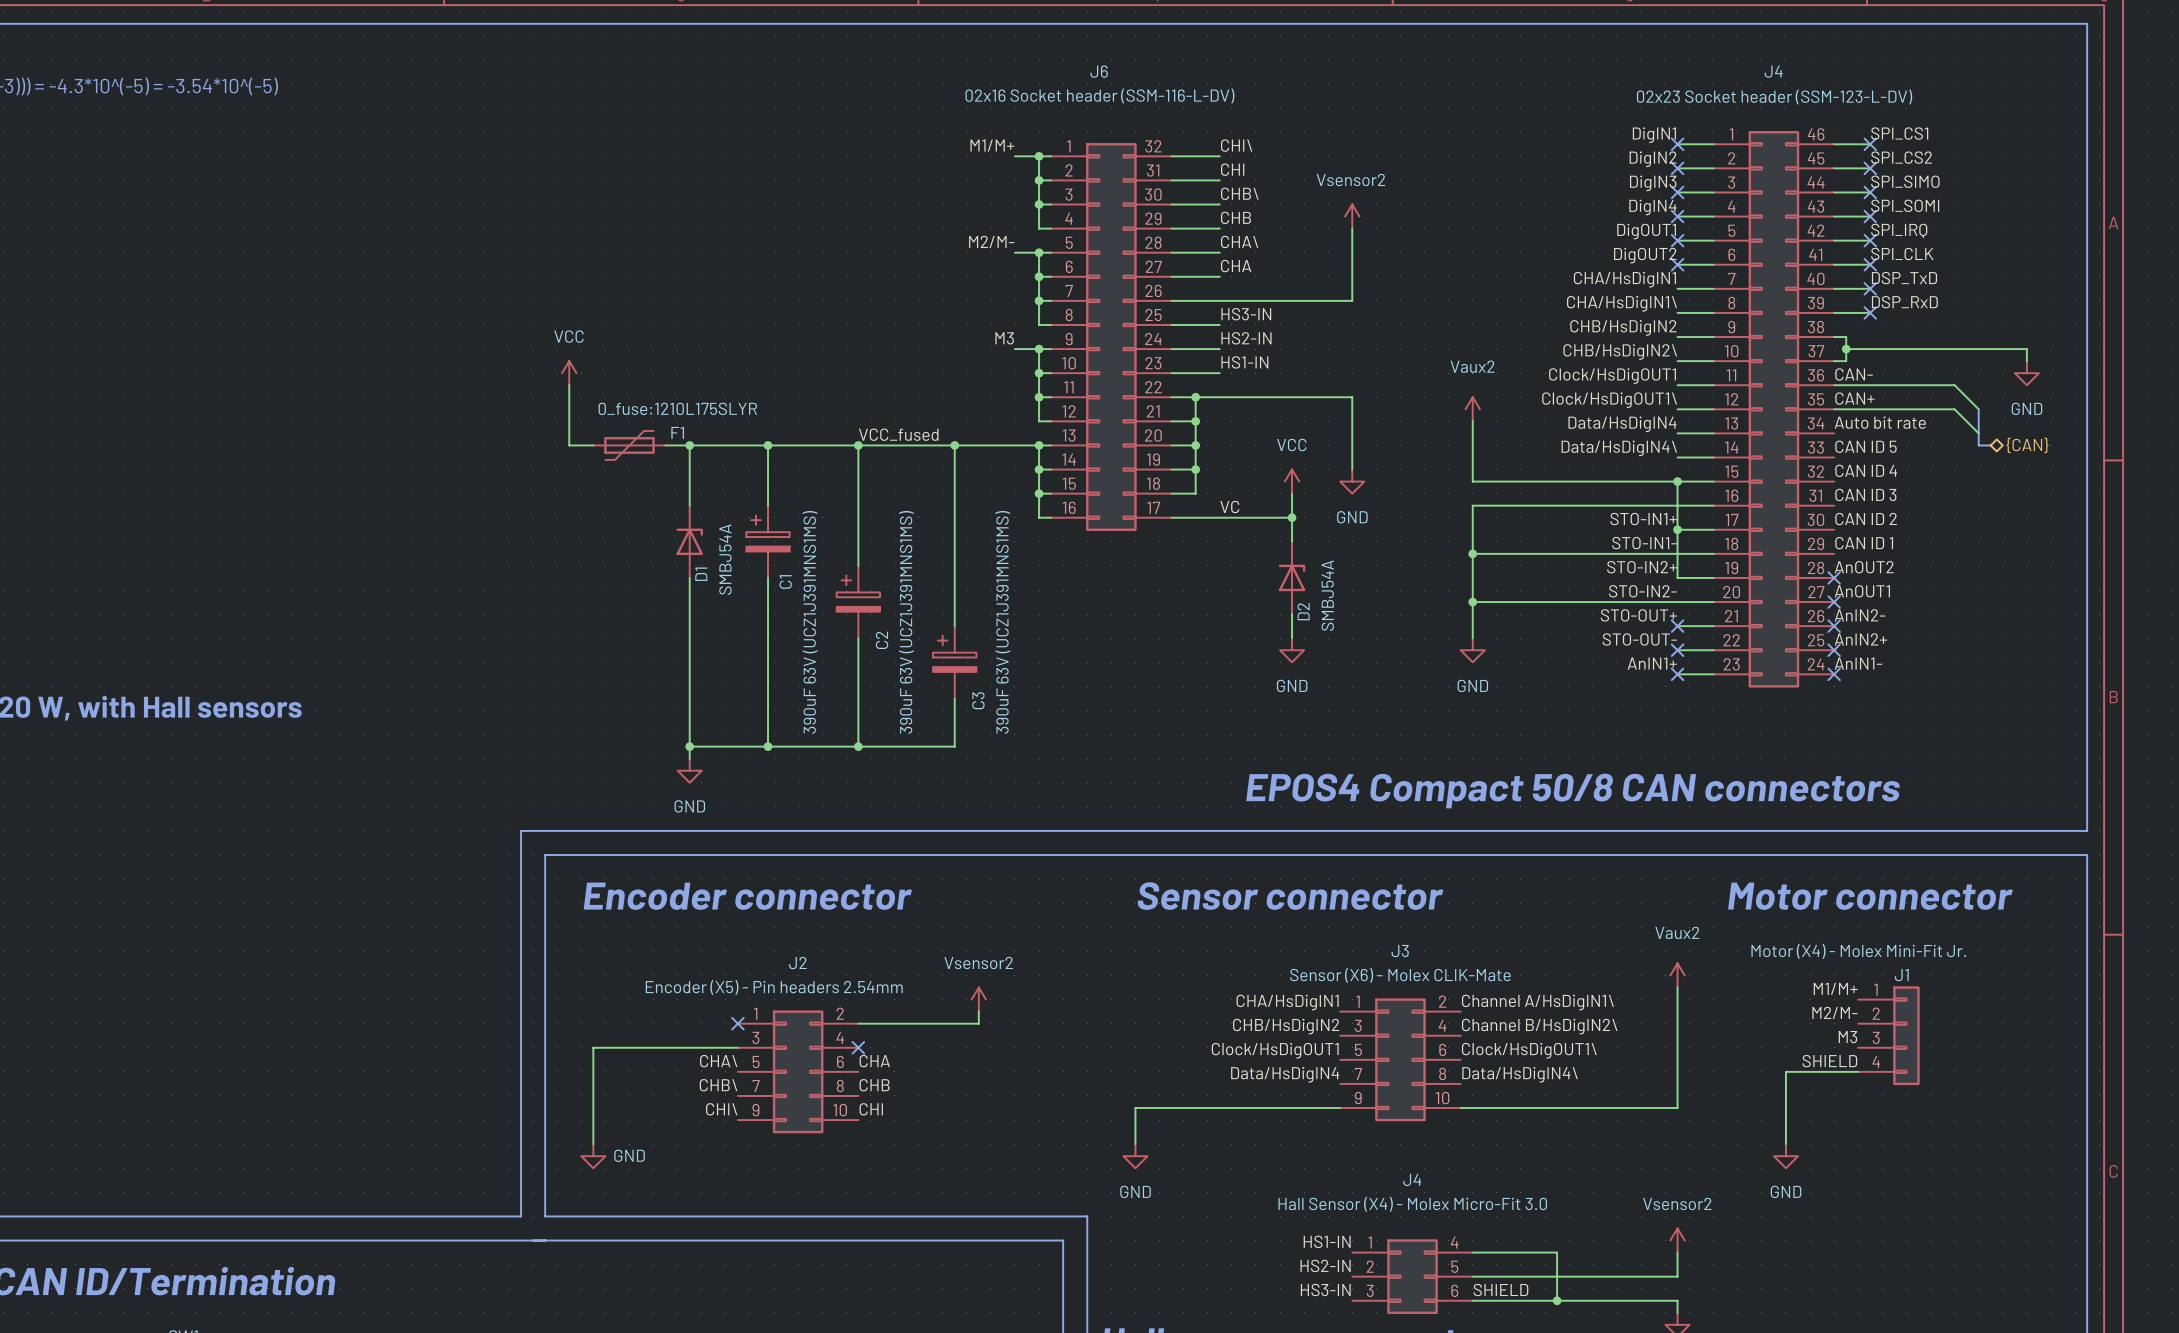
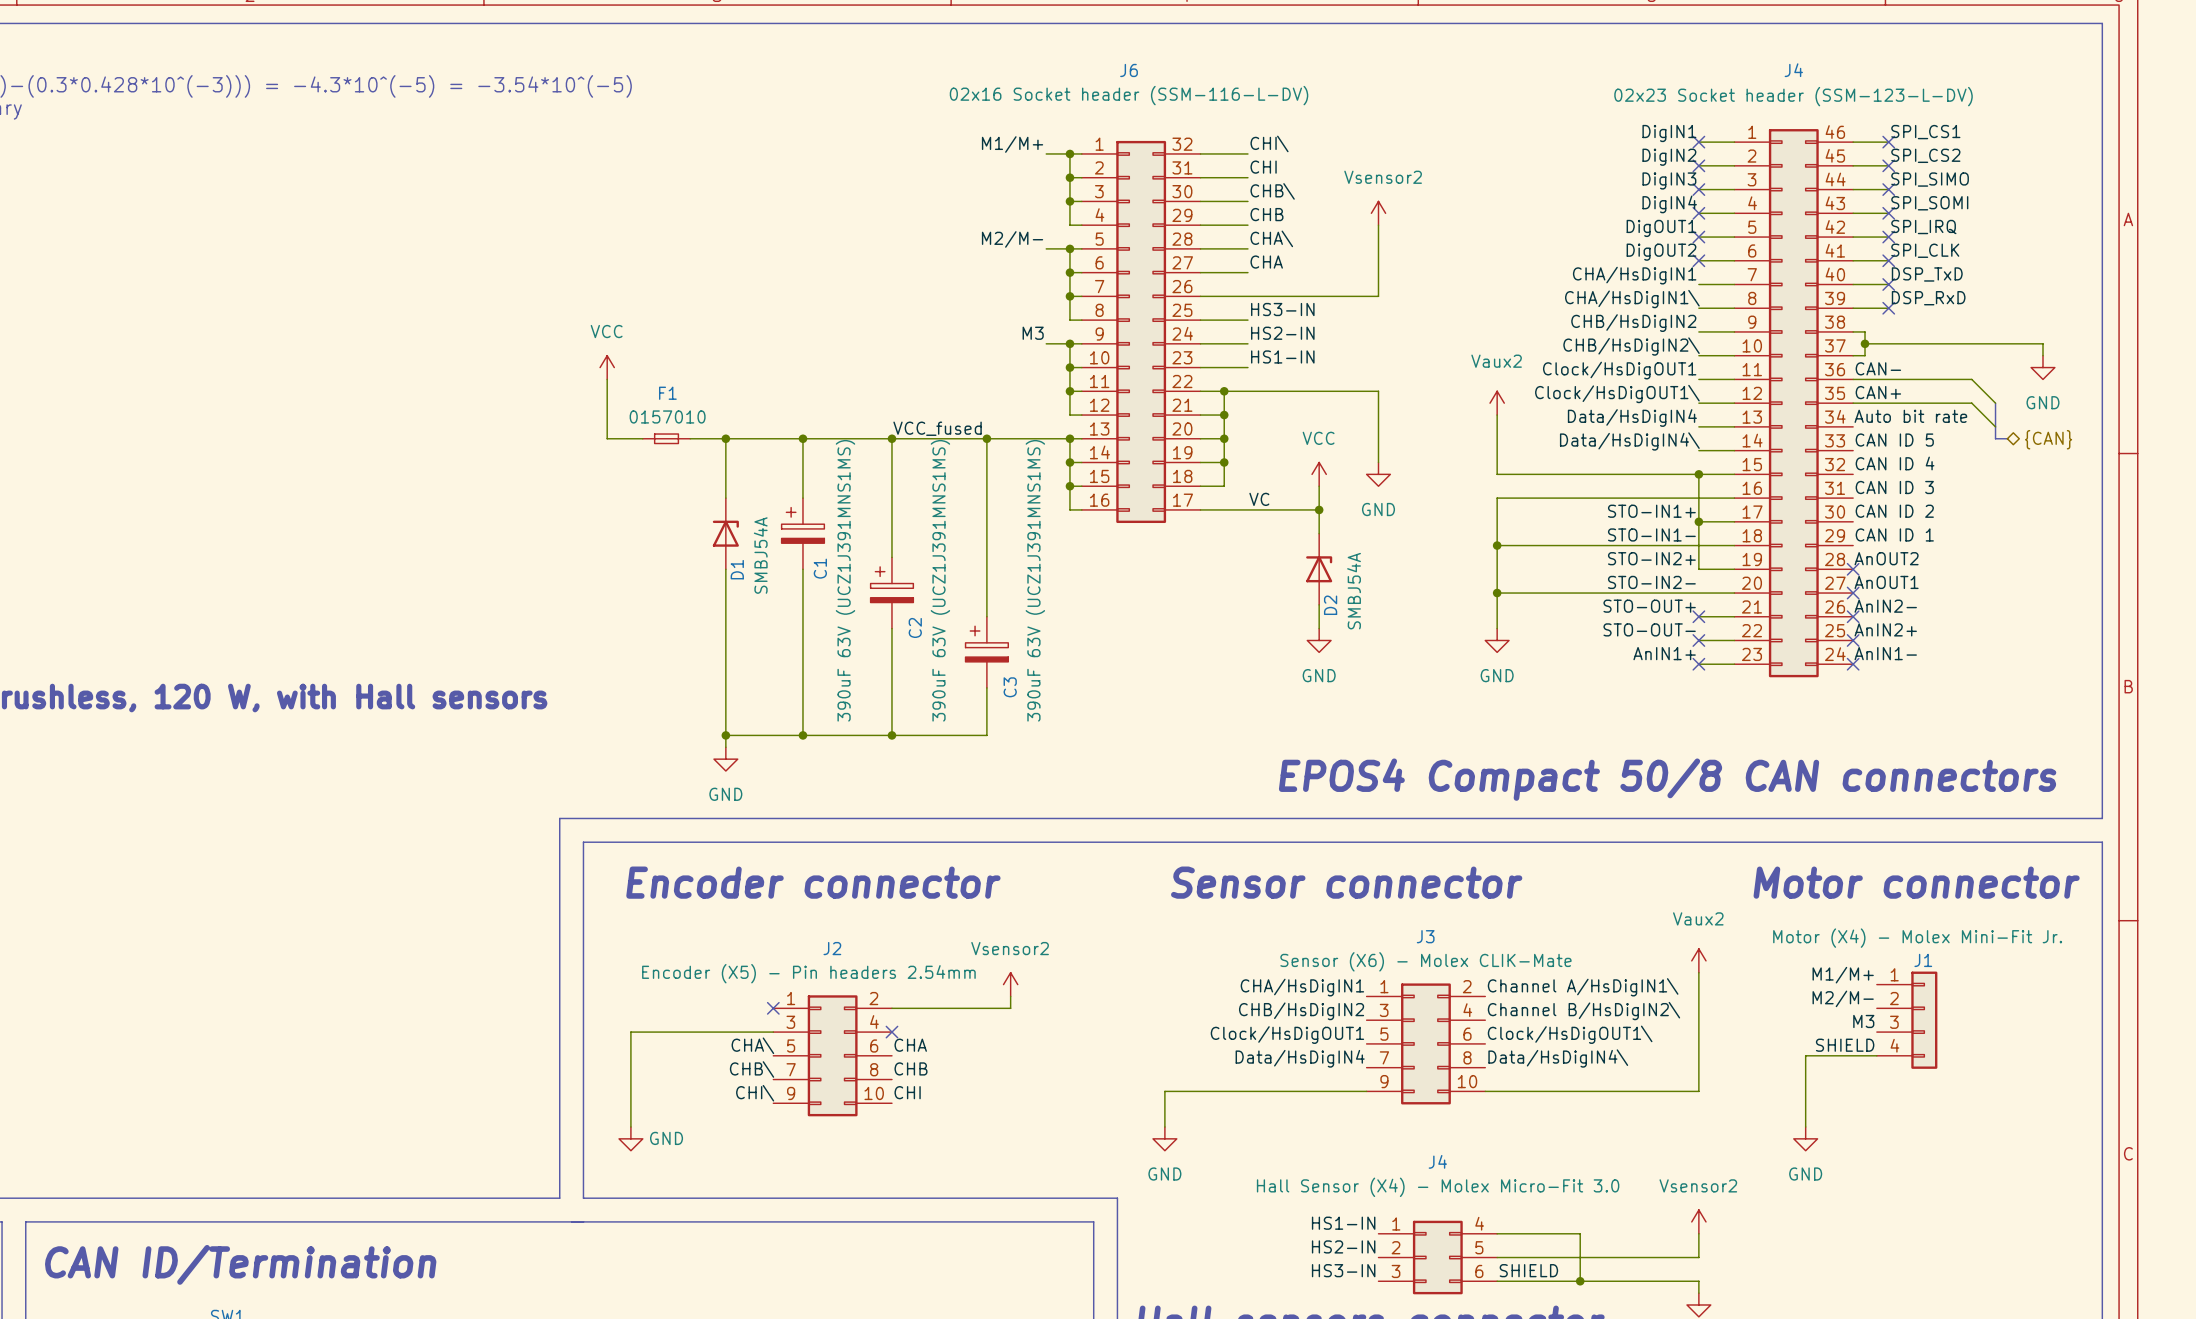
F1 value: 0_fuse:1210L175SLYR (677, 408) -> 0157010 (667, 416)
F1 symbol: [593, 430, 666, 460] -> [642, 434, 691, 444]
F1 name position: F1 (677, 432) -> F1 (667, 393)

